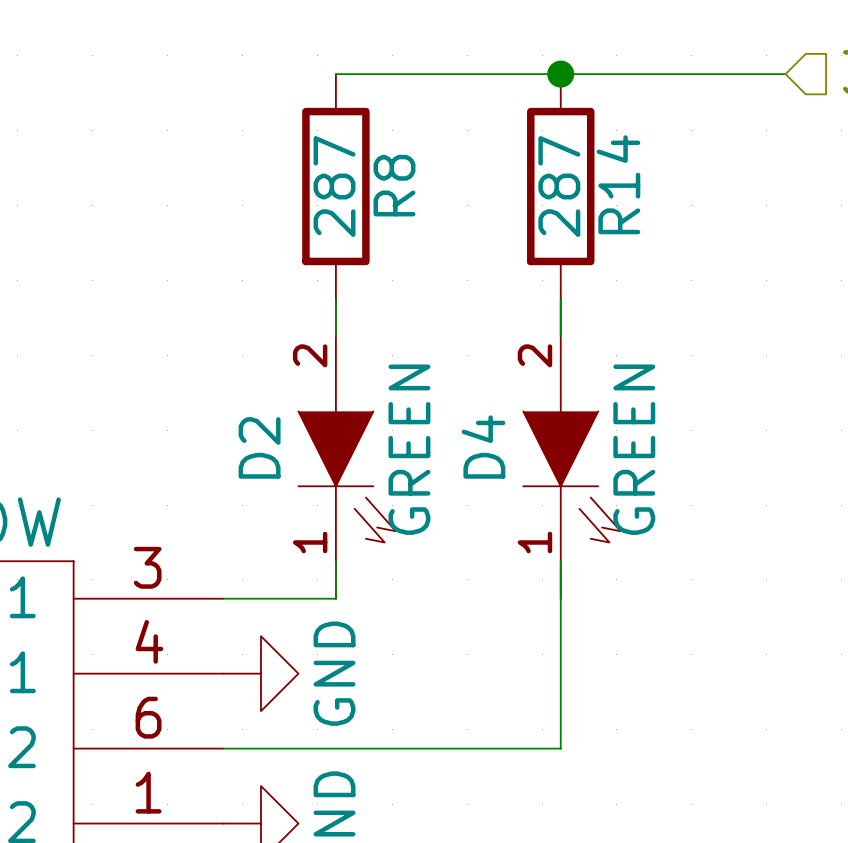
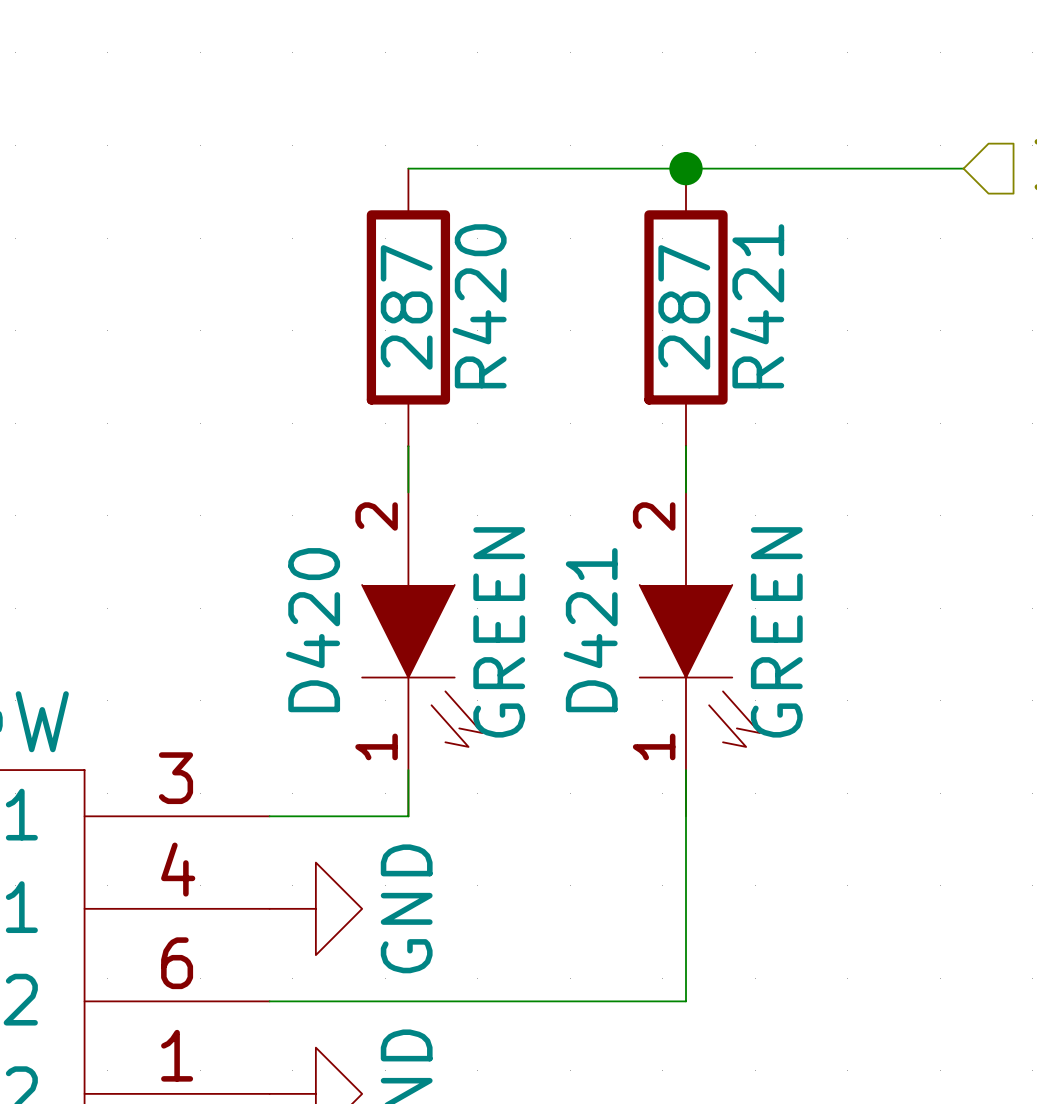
R14 name: R14 (618, 184) -> R421 (757, 306)
R8 name: R8 (394, 185) -> R420 (479, 306)
D2 name: D2 (259, 447) -> D420 (313, 630)
D4 name: D4 (483, 447) -> D421 (590, 630)

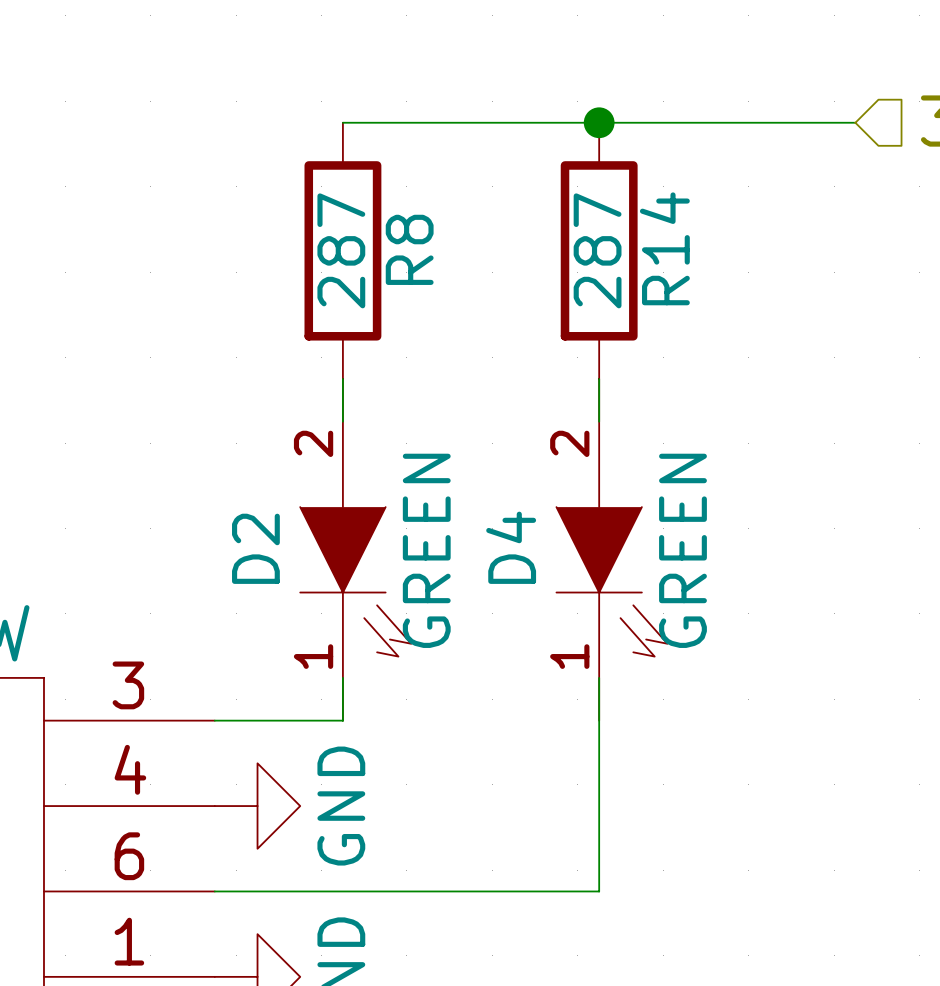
R420 name: R420 (479, 306) -> R8 (409, 249)
R421 name: R421 (757, 306) -> R14 (664, 248)
D420 name: D420 (313, 630) -> D2 (255, 548)
D421 name: D421 (590, 630) -> D4 (511, 547)

